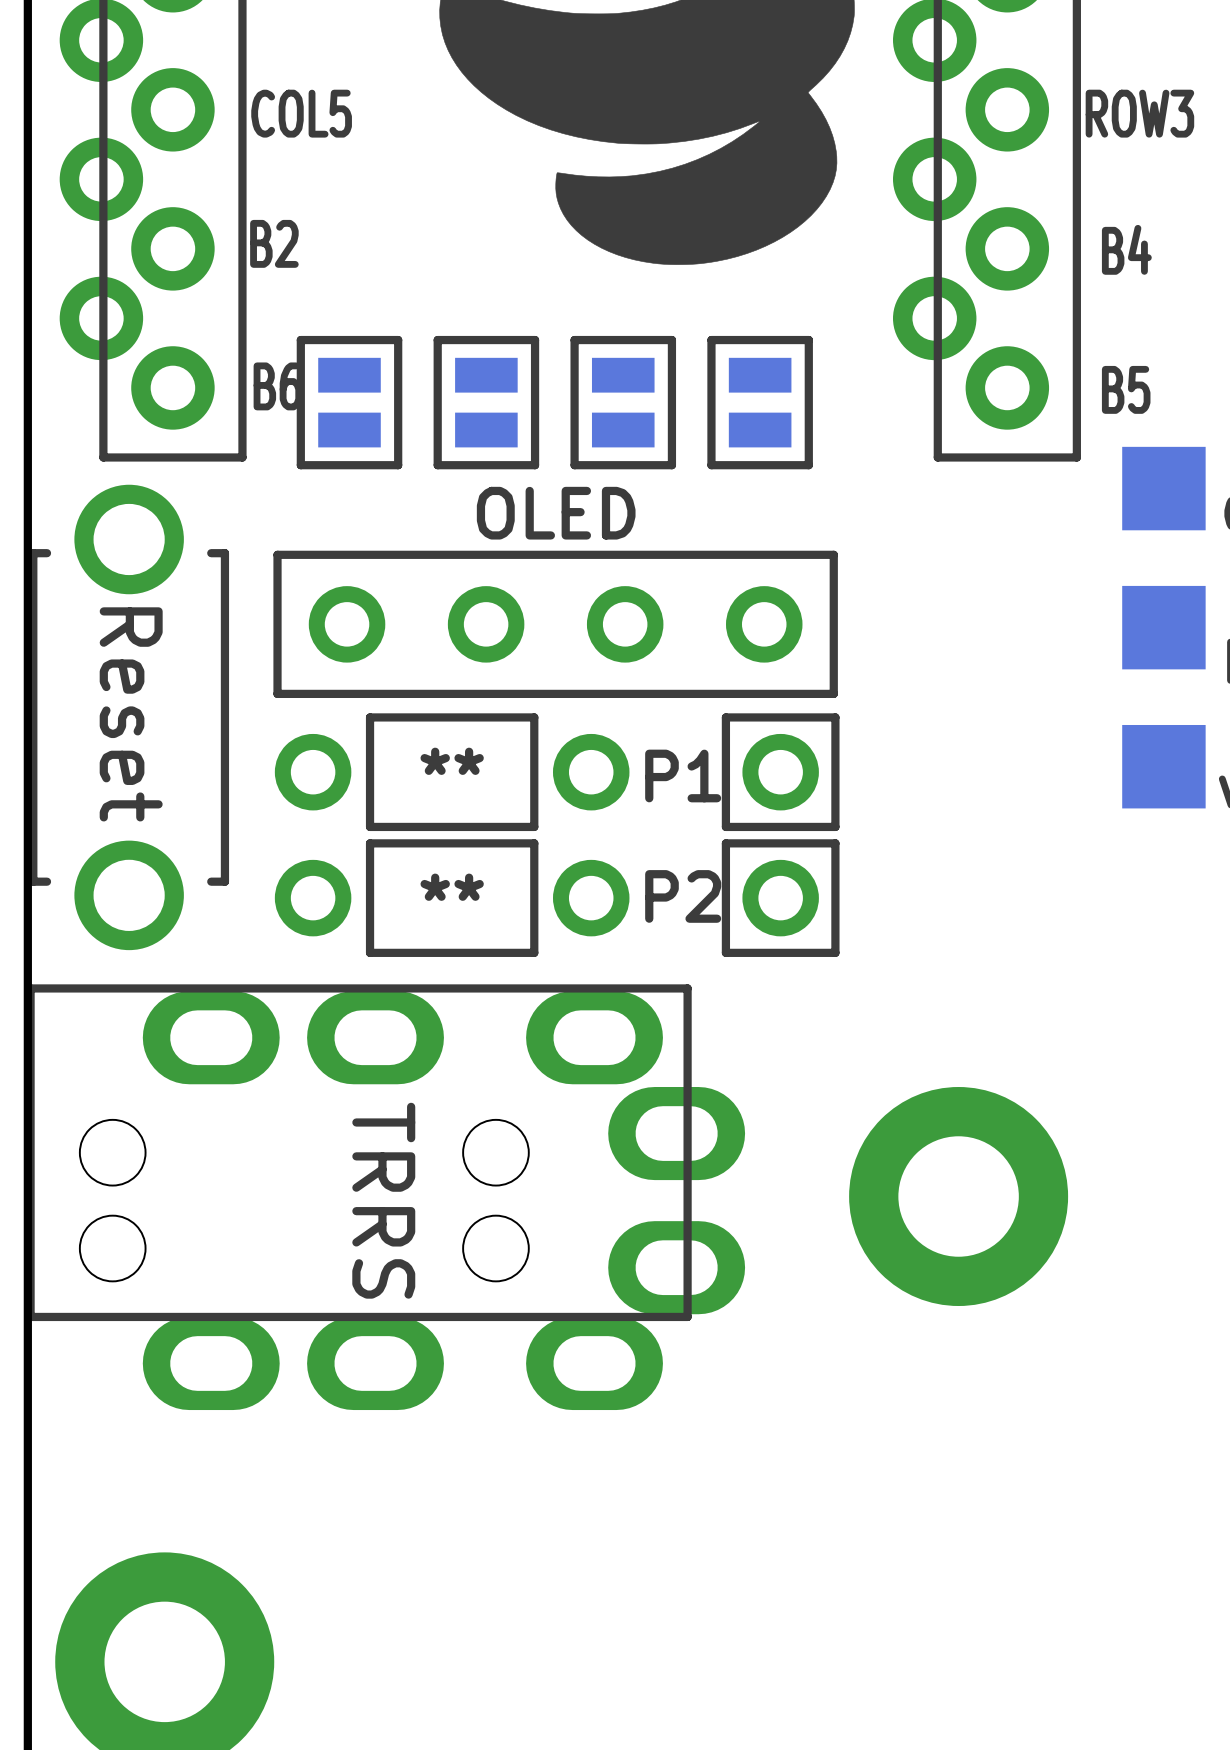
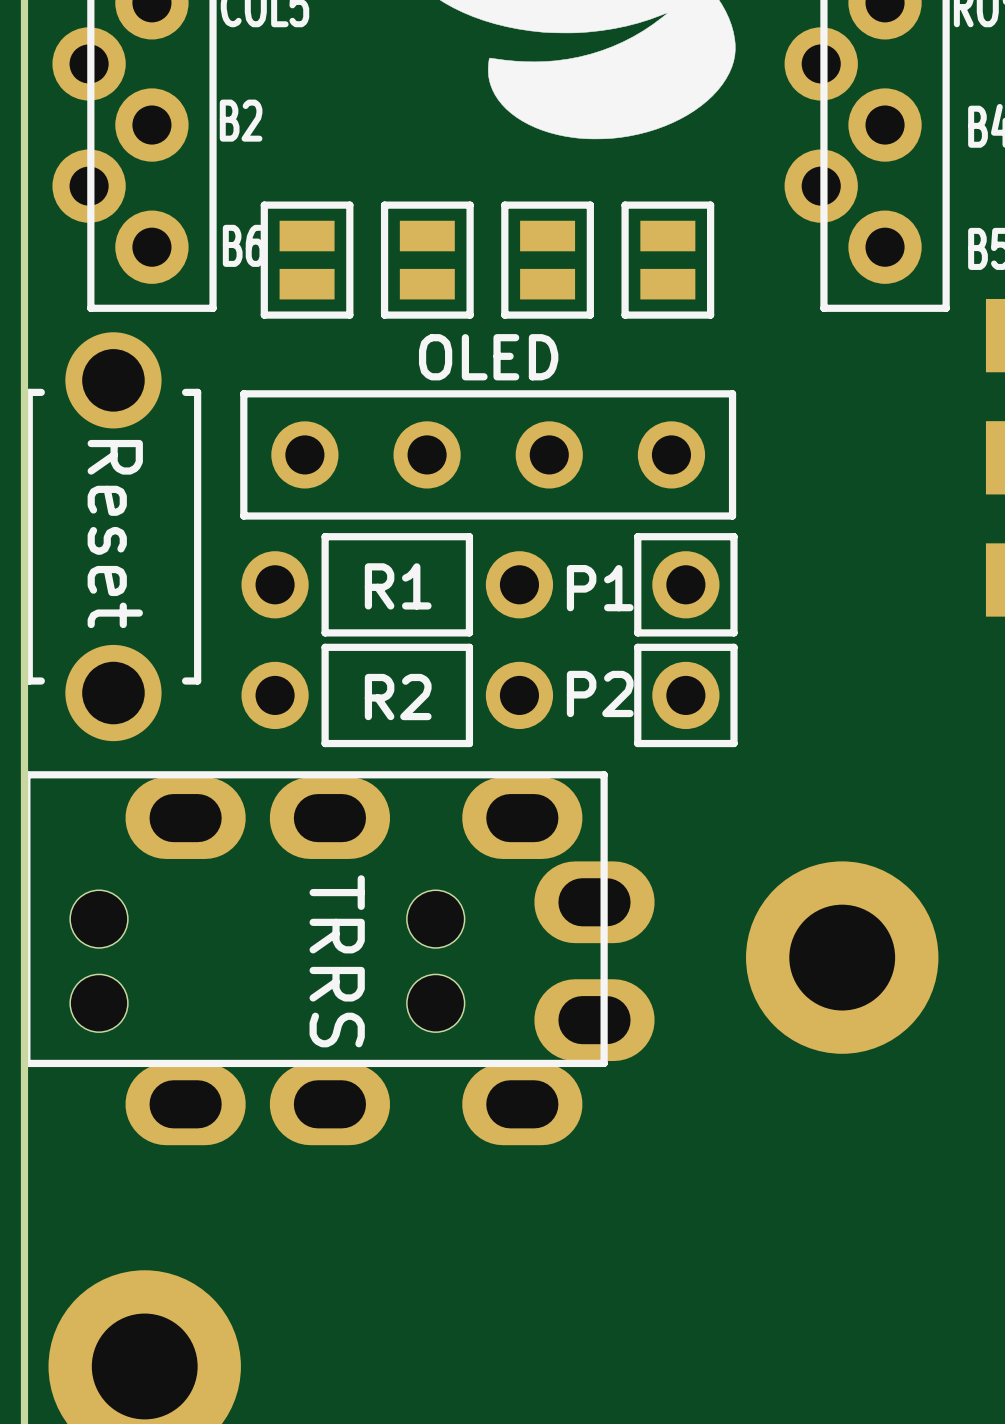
part text: ** (452, 761) -> R1 (398, 586)
part text: ** (452, 887) -> R2 (398, 697)

